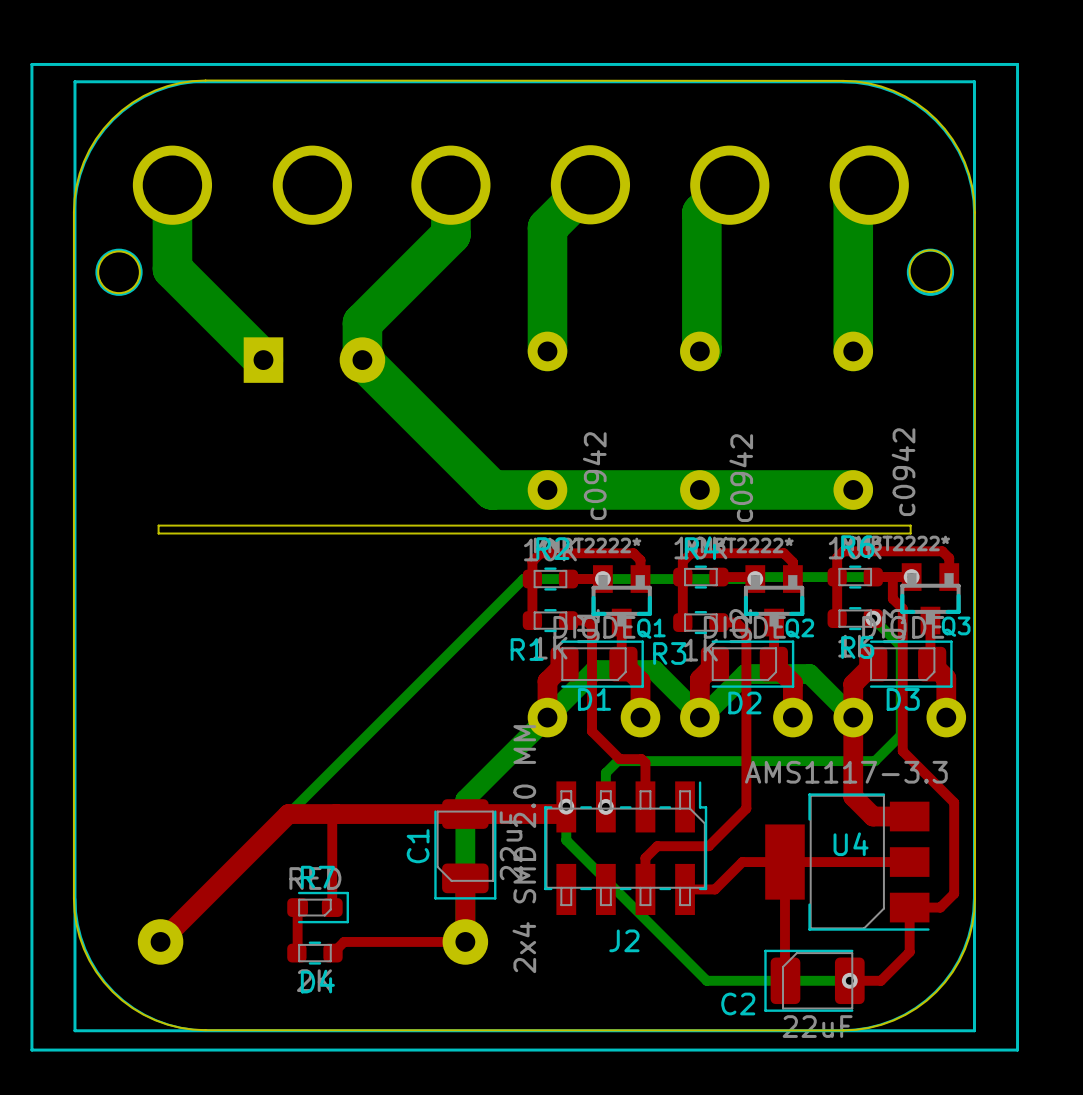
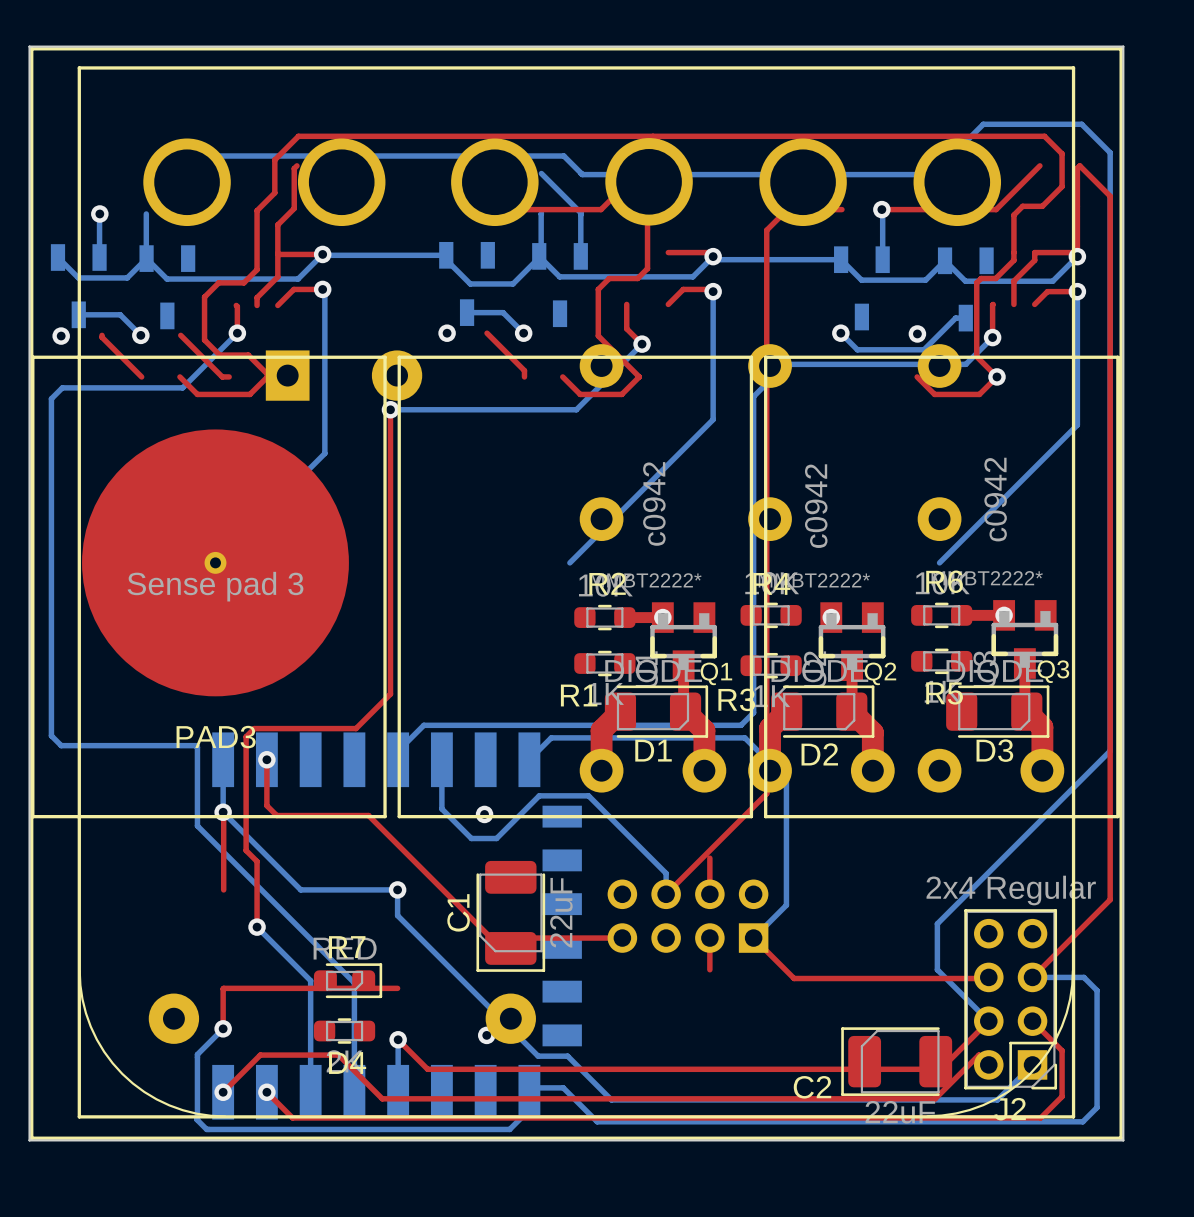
board edge: (205, 80) (856, 81) (881, 86) (905, 96) (926, 110) (944, 129) (964, 162) (972, 186) (974, 212) (974, 898) (969, 937) (959, 960) (945, 982) (926, 1000) (905, 1014) (881, 1024) (843, 1030) (205, 1030) (179, 1027) (143, 1014) (122, 1000) (103, 982) (83, 948) (76, 924) (73, 898) (74, 199) (79, 173) (89, 150) (112, 119) (132, 102) (155, 90) (179, 83) (205, 80) -> (29, 46) (29, 1140) (1123, 1140) (1123, 46) (29, 46)
line: (206, 81) (180, 84) (155, 91) (133, 103) (113, 120) (96, 140) (84, 162) (77, 187) (74, 213) -> none
line: (842, 82) (868, 84) (892, 92) (915, 104) (935, 120) (951, 140) (964, 163) (971, 188) (974, 213) -> none
top track: none -> (653, 136) (665, 148) (665, 188) (647, 206) (647, 268) (637, 278) (609, 278) (598, 289) (598, 335) (639, 376) (621, 394) (580, 394) (562, 376)
top track: none -> (296, 165) (294, 168) (294, 208) (277, 224) (277, 276) (257, 297) (257, 305)
top track: none -> (644, 165) (601, 209) (489, 209)
top track: none -> (1039, 165) (996, 209) (881, 209)
bottom track: none -> (541, 173) (581, 214)
bottom track: none -> (186, 175) (205, 156) (563, 156) (582, 174) (944, 174) (944, 163) (983, 124) (1081, 124) (1110, 152) (1110, 751) (937, 923) (937, 969) (988, 1021)
bottom track: (590, 184) (547, 227) (547, 351) -> none
bottom track: (172, 185) (172, 269) (263, 360) -> none
bottom track: (450, 185) (450, 234) (362, 323) (362, 360) (492, 489) (853, 489) -> none
bottom track: (729, 185) (701, 213) (701, 349) (699, 351) -> none
bottom track: (869, 185) (853, 201) (853, 351) -> none
top track: none -> (841, 209) (787, 209) (766, 230) (766, 793) (666, 894)
bottom track: none -> (881, 209) (882, 259)
via: none -> (881, 209)
via: none -> (99, 213)
bottom track: none -> (146, 213) (146, 258) (167, 279) (298, 279) (322, 254) (446, 255) (446, 259) (470, 283) (512, 283) (539, 256)
bottom track: none -> (541, 213) (541, 254) (539, 256)
bottom track: none -> (99, 214) (99, 257)
bottom track: none -> (580, 214) (580, 256)
drawing: [95, 248, 143, 296] -> none
top track: none -> (668, 252) (709, 252) (713, 256)
drawing: [906, 248, 955, 296] -> none
top track: none -> (277, 253) (322, 254)
round board edge: [908, 249, 953, 294] -> none
round board edge: [97, 250, 141, 295] -> none
via: none -> (322, 254)
bottom track: none -> (539, 256) (559, 276) (692, 276) (713, 256) (716, 259) (841, 259) (861, 280) (925, 280) (945, 260) (965, 281) (1052, 281) (1077, 256)
via: none -> (713, 256)
via: none -> (1077, 256)
bottom track: none -> (57, 257) (78, 277) (127, 277) (146, 258)
part: none -> (467, 283)
part: none -> (560, 285)
part: none -> (78, 286)
part: none -> (167, 287)
part: none -> (861, 288)
top track: none -> (322, 289) (293, 289) (277, 305)
bottom track: none -> (322, 289) (324, 291) (324, 453) (215, 562)
via: none -> (322, 289)
part: none -> (965, 289)
top track: none -> (713, 291) (710, 289) (683, 289) (668, 304)
via: none -> (713, 291)
top track: none -> (1077, 291) (1047, 291) (1034, 304)
bottom track: none -> (1077, 291) (1077, 425) (939, 562)
via: none -> (1077, 291)
bottom track: none -> (710, 293) (713, 291) (713, 419) (569, 562)
top track: none -> (626, 304) (626, 328) (642, 344)
top track: none -> (993, 304) (992, 337)
top track: none -> (1013, 304) (1013, 281) (1034, 260) (1034, 252) (1073, 252) (1077, 256) (1077, 168) (1079, 165) (1110, 196) (1110, 899) (1032, 977)
top track: none -> (236, 305) (237, 333)
bottom track: none -> (467, 312) (503, 312) (523, 333)
bottom track: none -> (78, 318) (78, 314) (120, 314) (140, 335)
bottom track: none -> (965, 318) (955, 318) (923, 349) (857, 349) (840, 333)
bottom track: none -> (237, 333) (182, 387) (62, 387) (51, 398) (51, 735) (61, 745) (195, 745) (197, 747) (197, 825) (354, 982) (354, 1092)
via: none -> (237, 333)
via: none -> (447, 333)
top track: none -> (487, 333) (524, 370) (524, 376)
via: none -> (523, 333)
via: none -> (840, 333)
via: none -> (917, 333)
top track: none -> (102, 335) (141, 376)
via: none -> (140, 335)
top track: none -> (180, 335) (222, 376) (229, 376)
via: none -> (61, 336)
bottom track: none -> (992, 337) (965, 364) (785, 364) (753, 396) (753, 712) (741, 725) (423, 725) (398, 751)
via: none -> (992, 337)
bottom track: none -> (642, 344) (576, 409) (390, 409)
via: none -> (642, 344)
line: none -> (32, 357) (32, 816) (385, 816) (385, 357) (32, 357)
line: none -> (399, 357) (751, 357) (751, 816) (399, 816) (399, 357)
line: none -> (765, 357) (1117, 357) (1117, 816) (765, 816) (765, 357)
top track: none -> (997, 376) (979, 394) (934, 394) (917, 376)
top track: none -> (179, 376) (197, 394) (249, 394) (267, 376) (267, 374) (248, 355) (219, 355) (204, 340) (204, 297) (218, 282) (243, 282) (257, 269) (257, 210) (274, 192) (274, 159) (298, 136) (1044, 136) (1062, 153) (1062, 186) (1042, 206) (1022, 206) (1013, 215) (1013, 260) (995, 278) (981, 278) (976, 282) (976, 356) (996, 376)
via: none -> (996, 376)
top track: none -> (390, 409) (390, 694) (356, 728) (254, 728) (246, 736) (246, 850) (257, 861) (257, 927)
via: none -> (390, 409)
board edge: (158, 525) (910, 525) (910, 533) (158, 533) (158, 525) -> none
PAD3: none -> Sense pad 3 (215, 562)
top track: (718, 577) (753, 577) (755, 579) -> none
top track: (892, 577) (892, 598) (902, 608) (902, 751) (954, 802) (954, 893) (940, 907) (909, 907) (909, 952) (880, 980) (849, 980) -> none
bottom track: (911, 577) (523, 579) (160, 941) -> none
top track: (949, 577) (949, 558) (942, 551) (843, 551) (837, 557) (837, 618) -> none
top track: (640, 579) (640, 560) (633, 553) (540, 553) (532, 561) (532, 620) -> none
top track: (792, 579) (792, 562) (783, 553) (690, 553) (682, 561) (682, 622) -> none
bottom track: (873, 618) (900, 646) (900, 735) (875, 761) (617, 761) (605, 772) (605, 806) -> none
via: (873, 618) -> none
top track: (568, 620) (586, 620) (592, 626) (592, 731) (619, 759) (641, 759) (645, 763) (645, 806) -> none
top track: (720, 620) (718, 622) (736, 622) (746, 632) (746, 808) (708, 846) (657, 846) (645, 858) (645, 889) -> none
top track: (873, 664) (853, 684) (853, 796) (873, 816) (909, 816) -> none
bottom track: none -> (223, 759) (223, 812) (300, 889) (397, 889) (397, 915) (538, 1056) (567, 1056) (611, 1099) (997, 1099) (1032, 1064)
top track: none -> (266, 759) (266, 805) (276, 815) (368, 815) (491, 938) (622, 938)
via: none -> (266, 759)
bottom track: none -> (441, 759) (441, 808) (471, 838) (496, 838) (539, 795) (588, 795) (666, 873) (666, 894)
bottom track: none -> (529, 759) (551, 737) (744, 737) (786, 779) (786, 905) (753, 938)
bottom track: (853, 717) (809, 674) (745, 674) (701, 717) (654, 670) (594, 670) (465, 799) (465, 941) -> none
top track: none -> (223, 812) (223, 889)
via: none -> (223, 812)
via: none -> (484, 814)
J2 footprint: [544, 781, 708, 915] -> [964, 909, 1058, 1090]
bottom track: (566, 806) (566, 840) (706, 980) (849, 980) -> none
via: (566, 806) -> none
via: (605, 806) -> none
top track: (336, 814) (332, 818) (332, 907) -> none
top track: (559, 814) (288, 814) (160, 941) -> none
via: none -> (397, 889)
J2 value: 2x4 SMD 2.0 MM (524, 849) -> 2x4 Regular (1011, 890)
part: none -> (688, 916)
part: none -> (397, 926)
bottom track: none -> (257, 927) (310, 980) (310, 1092)
via: none -> (257, 927)
top track: (784, 862) (785, 980) -> none
U4: AMS1117-3.3 (847, 862) -> none
top track: (909, 862) (742, 862) (715, 889) (685, 889) -> none
top track: none -> (753, 938) (794, 978) (988, 977)
top track: (465, 878) (465, 941) (344, 941) (333, 953) -> none
bottom track: none -> (1032, 977) (1083, 977) (1097, 990) (1097, 1107) (1082, 1121) (597, 1121) (563, 1087) (533, 1087) (529, 1092) (529, 1109) (509, 1129) (206, 1129) (196, 1119) (197, 1054) (223, 1028)
top track: (297, 907) (296, 953) -> none
top track: none -> (397, 988) (223, 988) (223, 1028)
top track: none -> (988, 1021) (940, 1069) (427, 1069) (398, 1039)
top track: none -> (1032, 1021) (1062, 1050) (1062, 1096) (1040, 1117) (292, 1117) (266, 1092)
via: none -> (223, 1028)
via: none -> (486, 1035)
bottom track: none -> (398, 1039) (398, 1075)
via: none -> (398, 1039)
via: (849, 980) -> none
top track: none -> (988, 1064) (978, 1055) (935, 1098) (382, 1098) (338, 1055) (260, 1055) (223, 1092)
via: none -> (223, 1092)
via: none -> (266, 1092)

